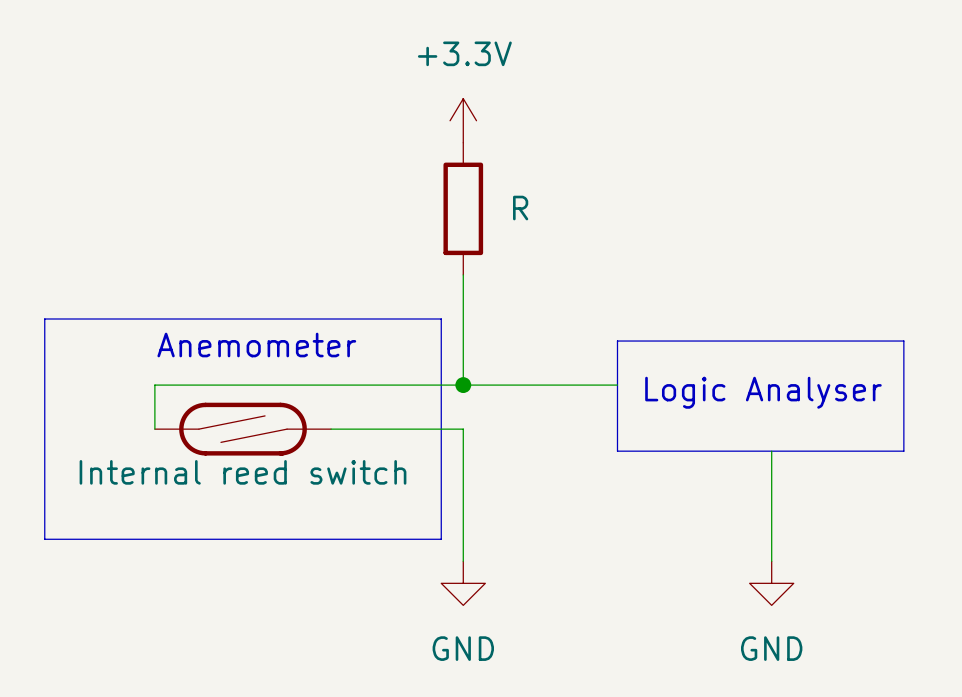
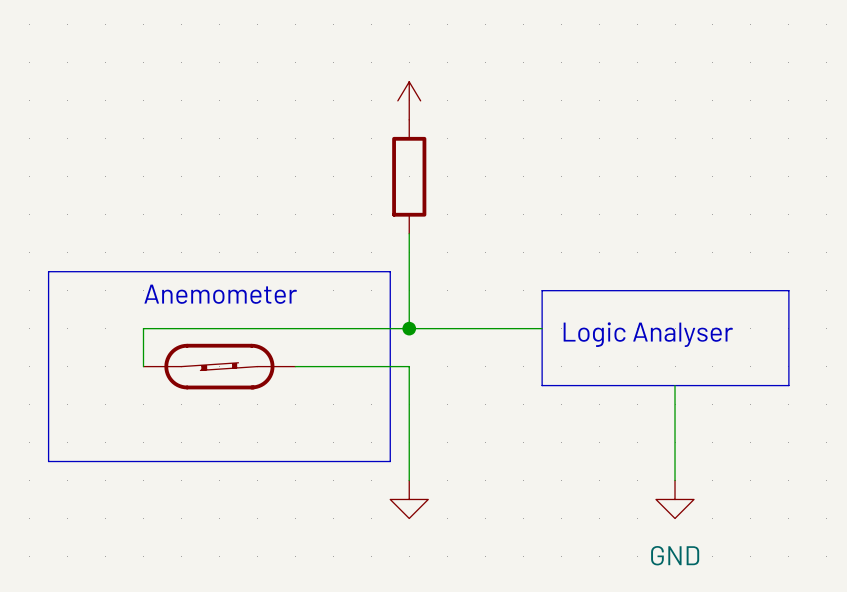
power symbol text: +3.3V (464, 53) -> none
part value: R (520, 208) -> none
part symbol: [154, 402, 332, 456] -> [143, 343, 296, 390]
part value: Internal reed switch (243, 472) -> none
power symbol text: GND (463, 648) -> none

